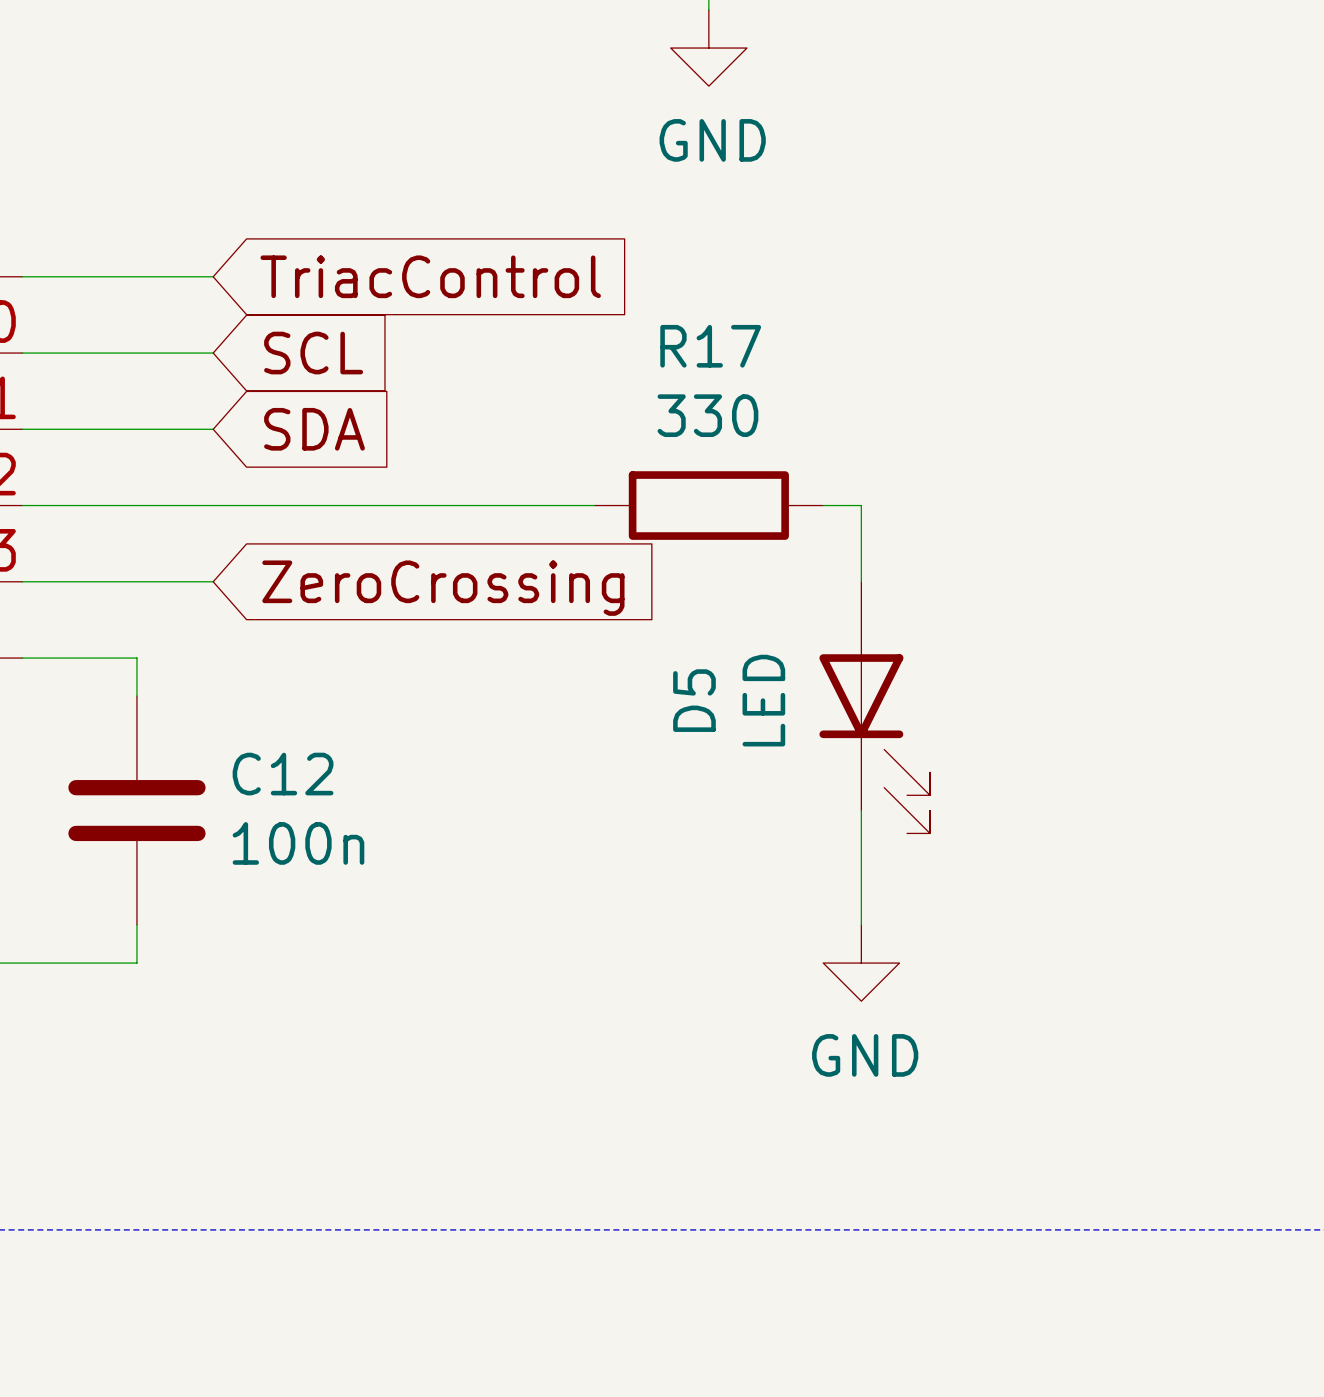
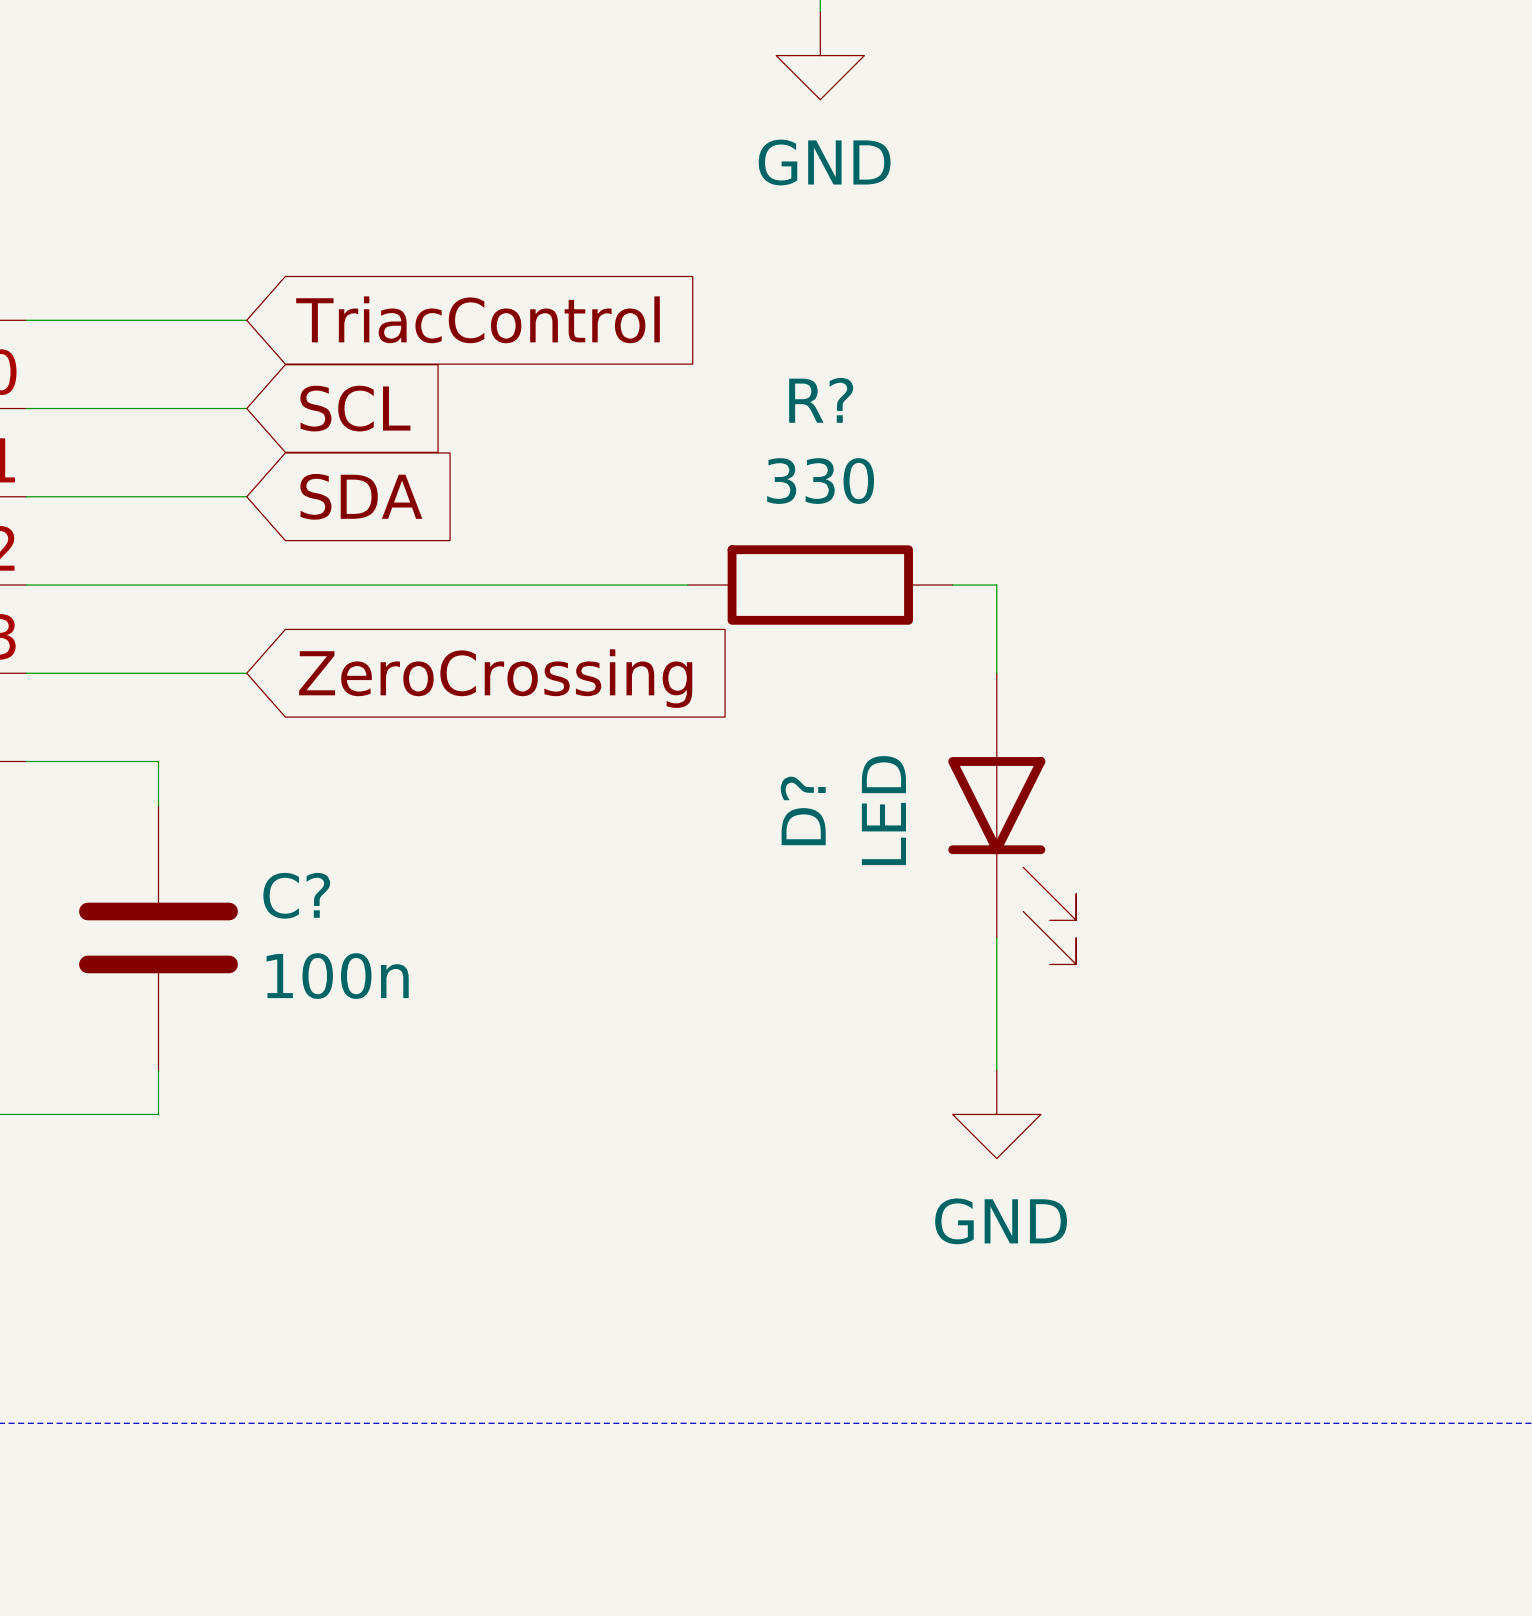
R17 name: R17 (710, 346) -> R? (821, 400)
D5 name: D5 (694, 700) -> D? (803, 810)
C12 name: C12 (283, 774) -> C? (296, 895)

